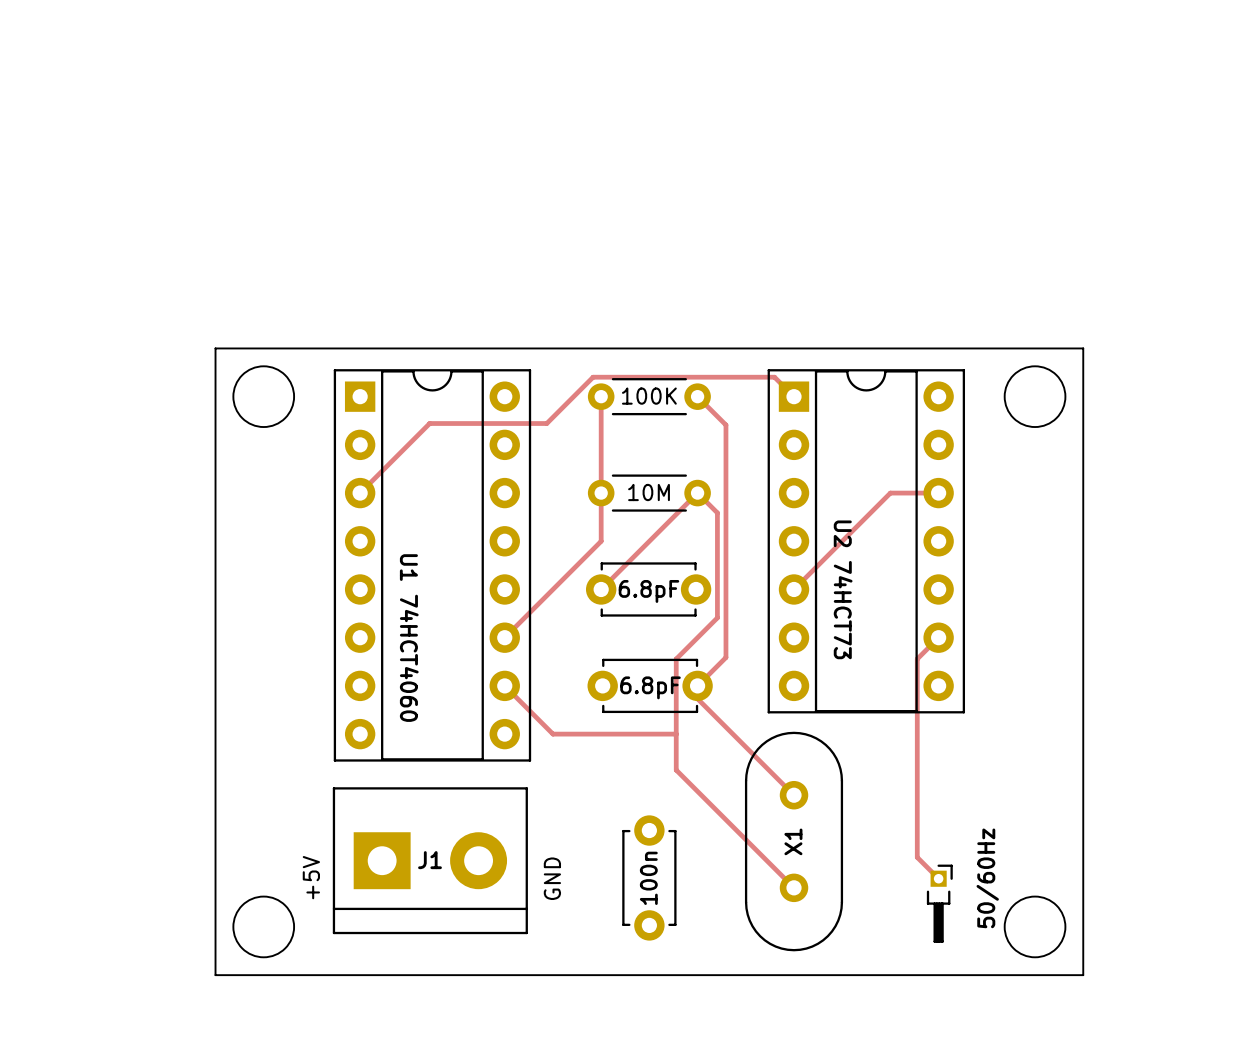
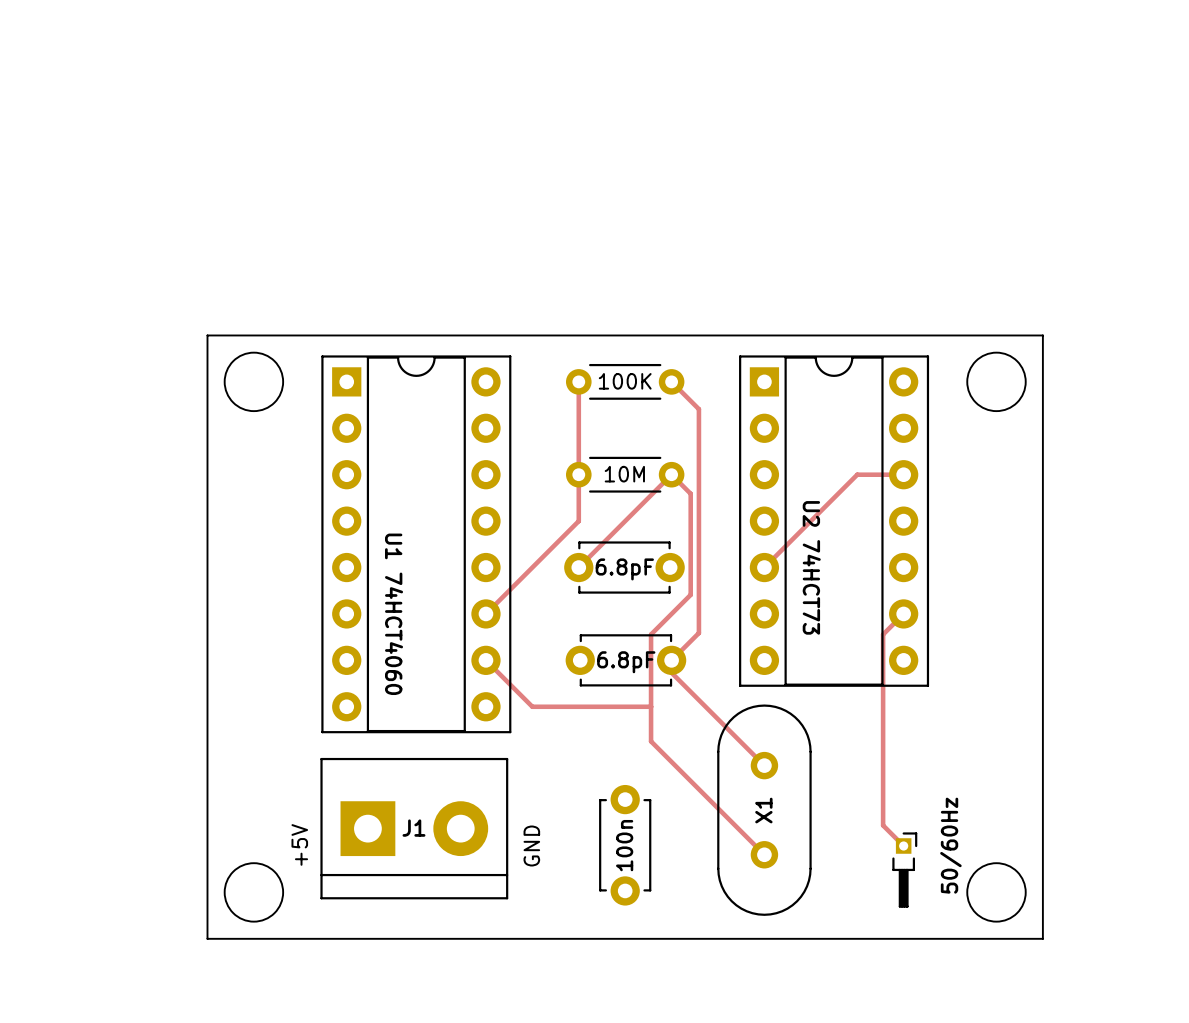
track: (794, 396) (774, 377) (593, 377) (546, 423) (429, 423) (360, 493) -> none

